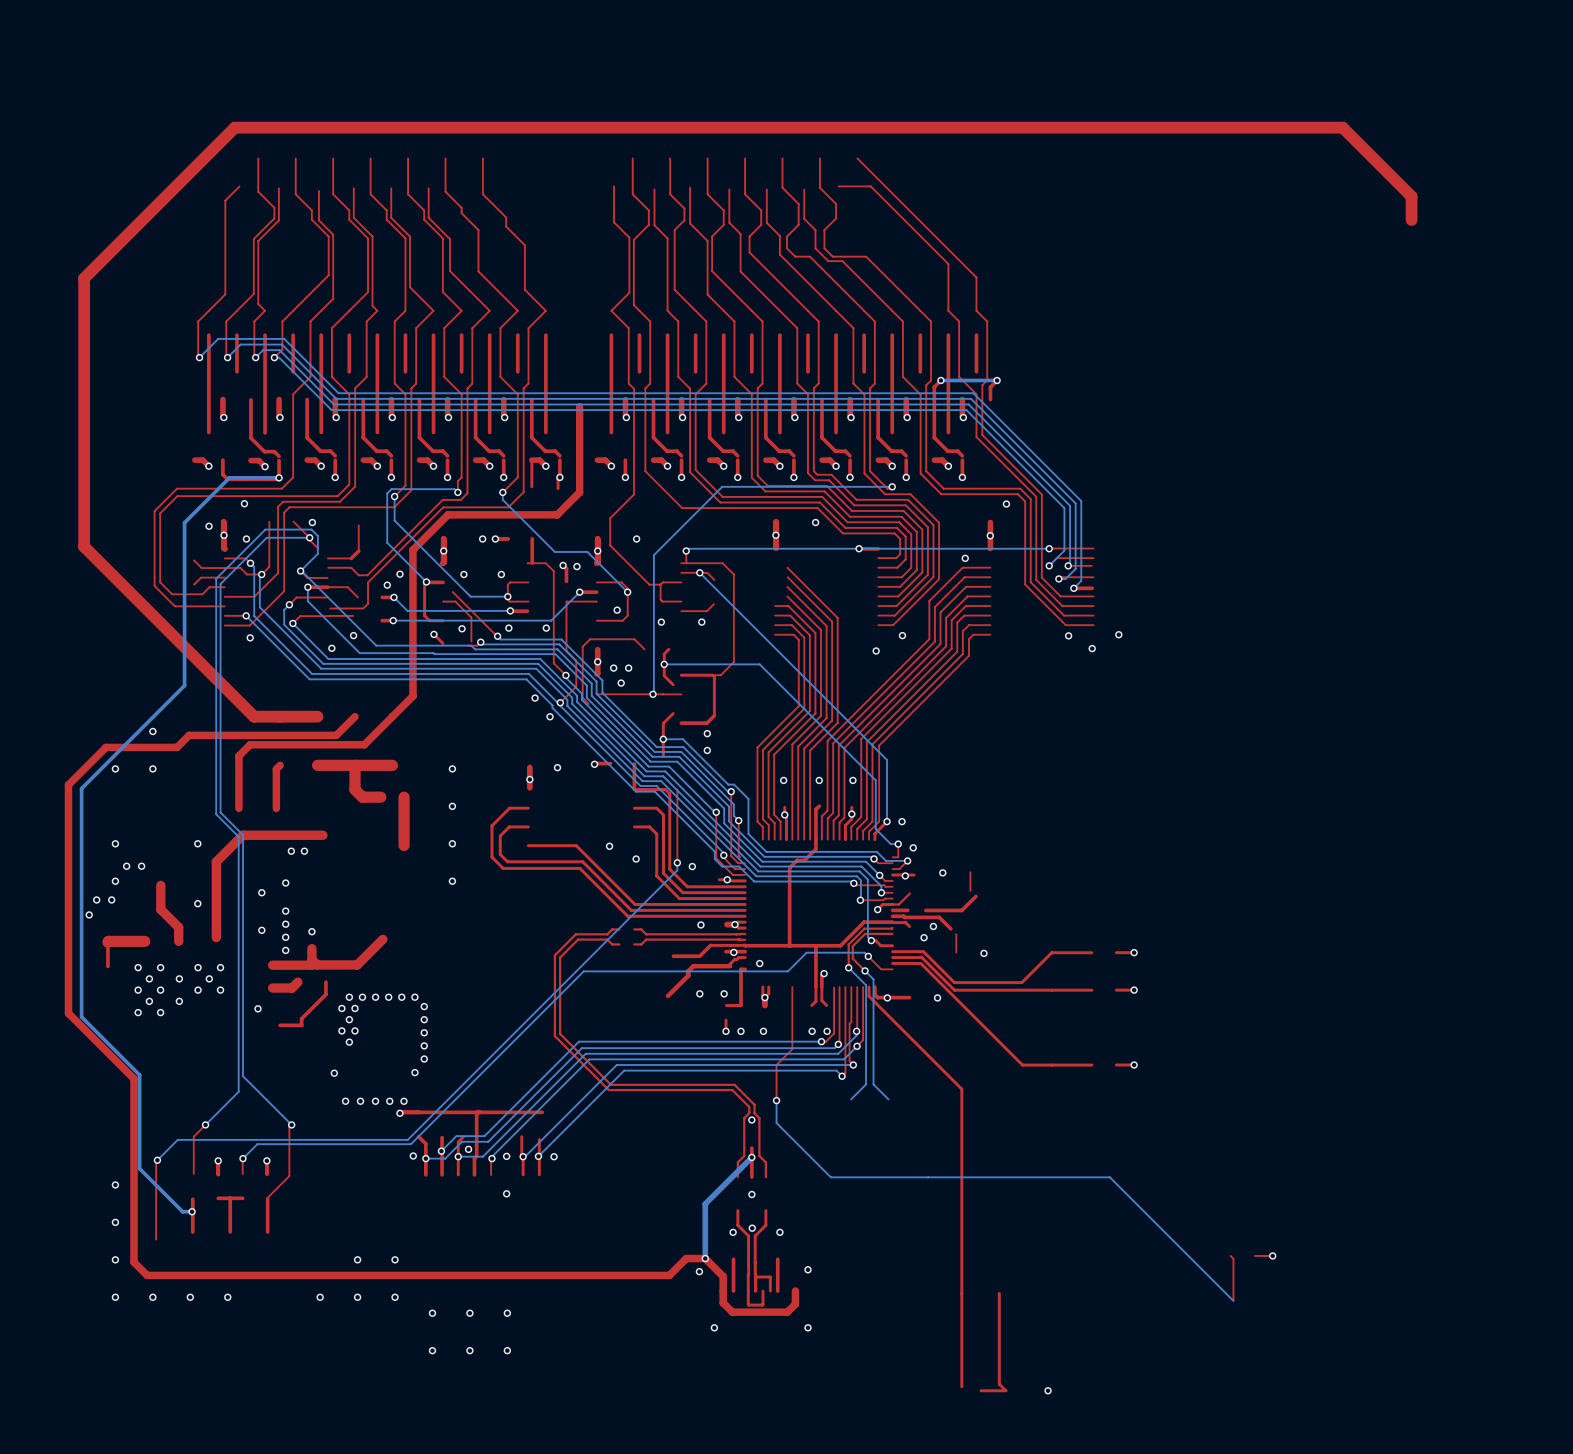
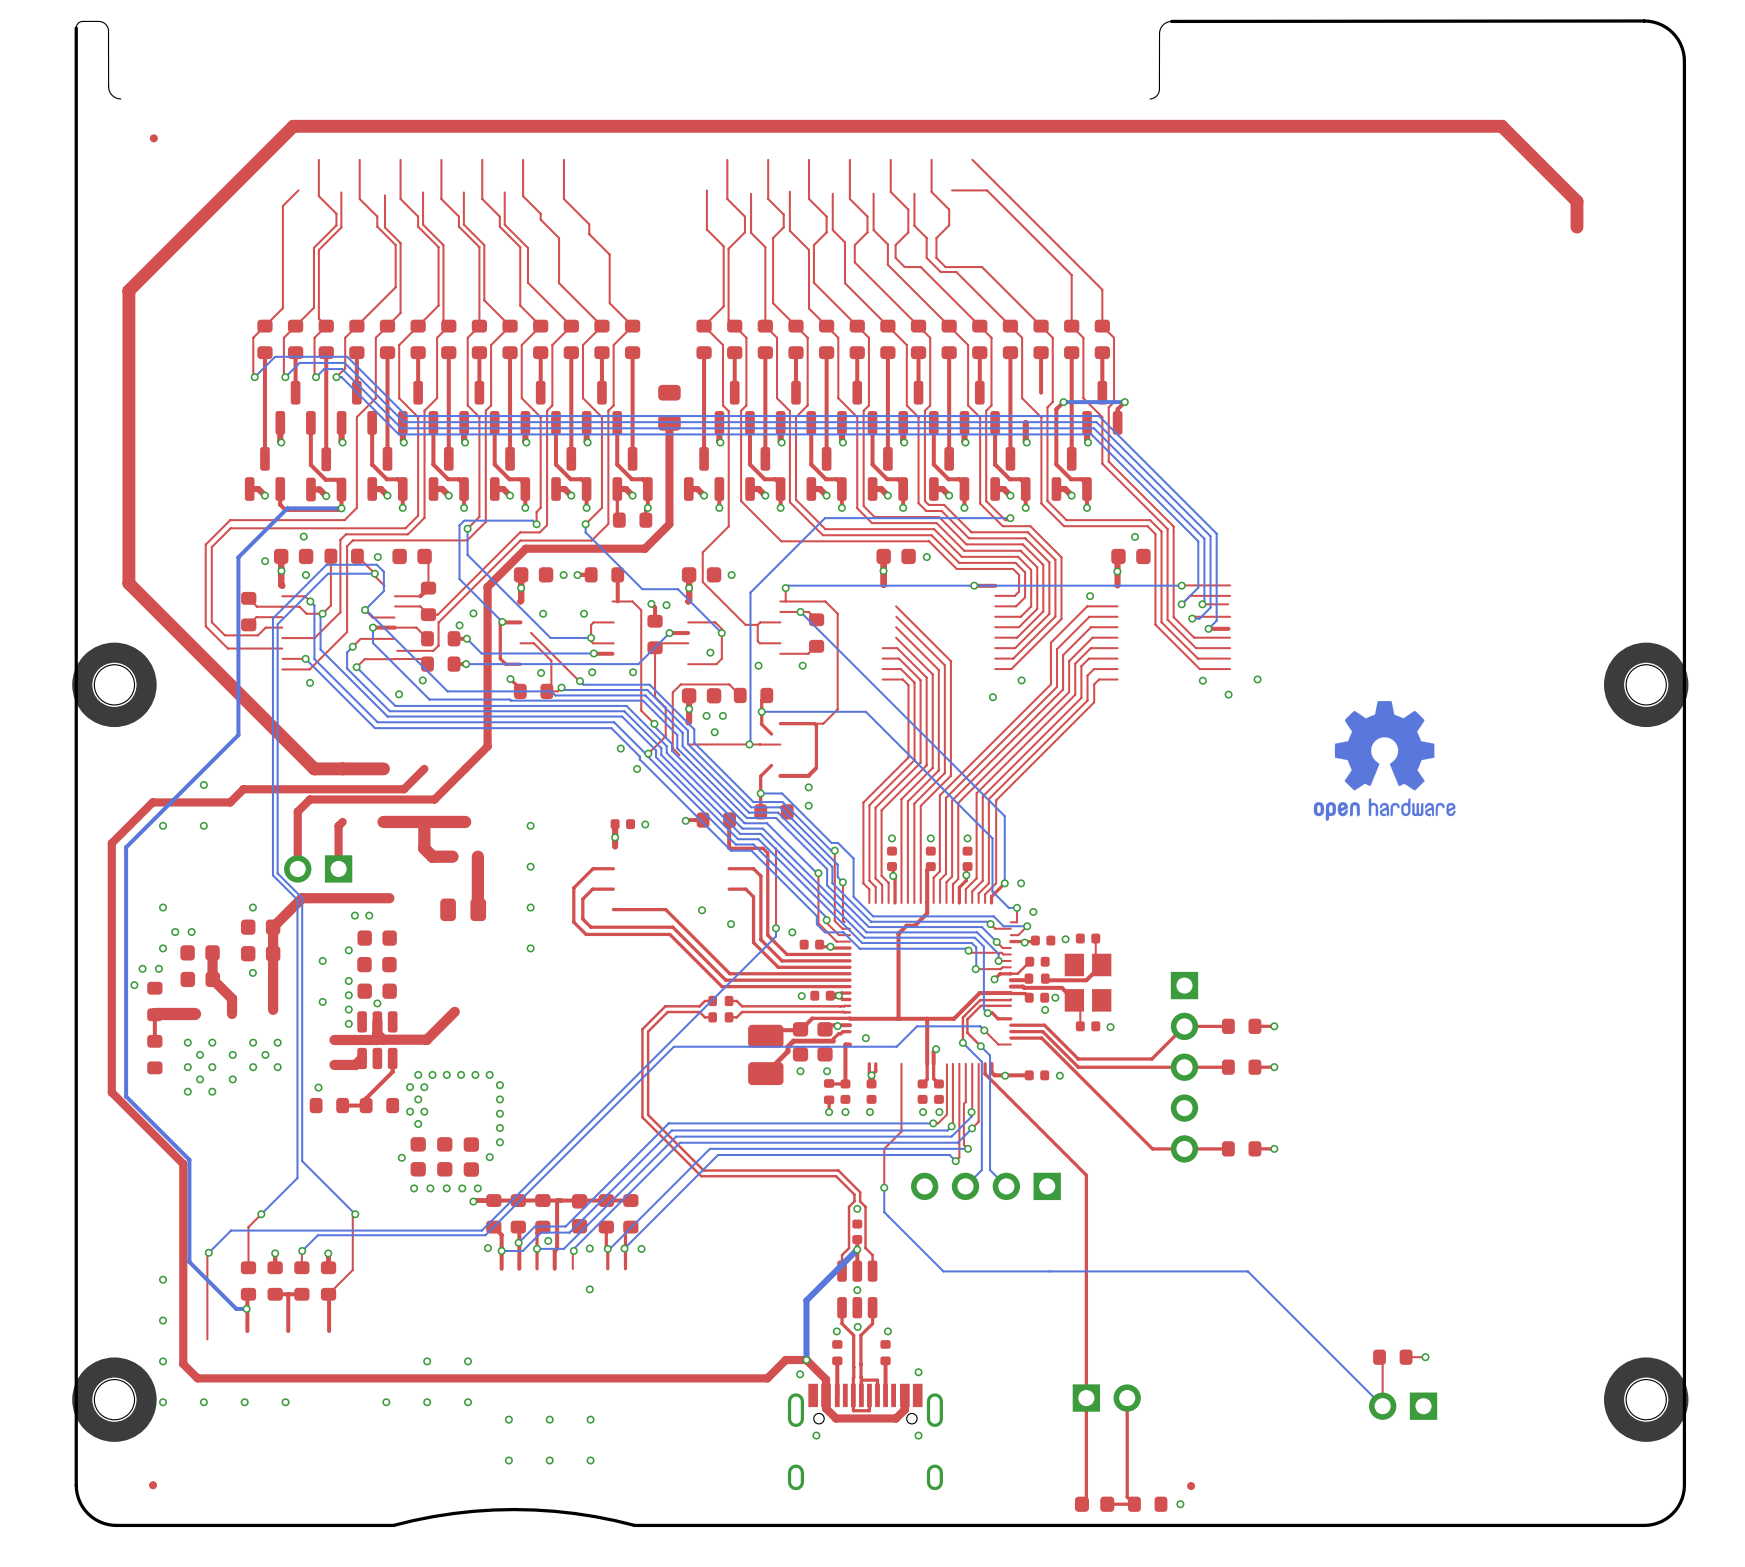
board edge: none -> (1150, 98) (1156, 96) (1159, 90) (1159, 30) (1163, 24) (1170, 21) (1644, 20) (1657, 23) (1665, 27) (1675, 36) (1682, 47) (1684, 61) (1684, 1485) (1682, 1498) (1675, 1510) (1665, 1519) (1657, 1523) (1644, 1525) (634, 1525) (574, 1513) (514, 1509) (453, 1513) (393, 1525) (116, 1525) (99, 1521) (88, 1513) (80, 1502) (76, 1485) (76, 27) (79, 22) (100, 21) (107, 26) (108, 89) (113, 96) (120, 98)
part: none -> (153, 138)
part: none -> (264, 339)
part: none -> (295, 339)
part: none -> (326, 339)
part: none -> (356, 339)
part: none -> (387, 339)
part: none -> (418, 339)
part: none -> (448, 339)
part: none -> (479, 339)
part: none -> (510, 339)
part: none -> (540, 339)
part: none -> (571, 339)
part: none -> (601, 339)
part: none -> (632, 339)
part: none -> (704, 339)
part: none -> (734, 339)
part: none -> (765, 339)
part: none -> (795, 339)
part: none -> (826, 339)
part: none -> (857, 339)
part: none -> (887, 339)
part: none -> (918, 339)
part: none -> (949, 339)
part: none -> (979, 339)
part: none -> (1010, 339)
part: none -> (1041, 339)
part: none -> (1071, 339)
part: none -> (1102, 339)
part: none -> (295, 407)
part: none -> (356, 407)
part: none -> (418, 407)
part: none -> (479, 407)
part: none -> (540, 407)
part: none -> (601, 407)
part: none -> (669, 407)
part: none -> (734, 407)
part: none -> (795, 407)
part: none -> (857, 407)
part: none -> (918, 407)
part: none -> (979, 407)
part: none -> (1102, 407)
part: none -> (264, 473)
part: none -> (326, 474)
part: none -> (387, 473)
part: none -> (448, 473)
part: none -> (510, 473)
part: none -> (571, 473)
part: none -> (632, 473)
part: none -> (704, 473)
part: none -> (765, 473)
part: none -> (826, 473)
part: none -> (887, 473)
part: none -> (949, 473)
part: none -> (1010, 473)
part: none -> (1071, 473)
part: none -> (632, 520)
part: none -> (293, 556)
part: none -> (344, 556)
part: none -> (412, 556)
part: none -> (896, 556)
part: none -> (1130, 556)
part: none -> (533, 574)
part: none -> (604, 574)
part: none -> (701, 574)
part: none -> (428, 601)
part: none -> (248, 611)
part: none -> (816, 633)
part: none -> (655, 634)
part: none -> (440, 638)
part: none -> (440, 664)
part: none -> (114, 684)
part: none -> (1646, 684)
part: none -> (533, 691)
part: none -> (701, 695)
part: none -> (753, 695)
drawing: none -> [1313, 701, 1456, 821]
part: none -> (773, 811)
part: none -> (716, 820)
part: none -> (622, 824)
part: none -> (891, 858)
part: none -> (930, 858)
part: none -> (967, 858)
part: none -> (318, 868)
part: none -> (463, 909)
part: none -> (260, 927)
part: none -> (377, 938)
part: none -> (1088, 938)
part: none -> (1043, 940)
part: none -> (811, 944)
part: none -> (200, 952)
part: none -> (260, 953)
part: none -> (1037, 961)
part: none -> (376, 964)
part: none -> (1037, 978)
part: none -> (200, 979)
part: none -> (1088, 982)
part: none -> (377, 991)
part: none -> (822, 995)
part: none -> (1036, 997)
part: none -> (154, 1001)
part: none -> (720, 1000)
part: none -> (720, 1017)
part: none -> (1088, 1026)
part: none -> (1241, 1026)
part: none -> (377, 1040)
part: none -> (800, 1041)
part: none -> (825, 1041)
part: none -> (154, 1054)
part: none -> (765, 1054)
part: none -> (1184, 1067)
part: none -> (1241, 1067)
part: none -> (1036, 1075)
part: none -> (829, 1091)
part: none -> (845, 1091)
part: none -> (871, 1091)
part: none -> (922, 1091)
part: none -> (938, 1091)
part: none -> (329, 1105)
part: none -> (379, 1105)
part: none -> (1241, 1148)
part: none -> (418, 1156)
part: none -> (444, 1156)
part: none -> (471, 1157)
part: none -> (985, 1186)
part: none -> (493, 1213)
part: none -> (518, 1213)
part: none -> (542, 1213)
part: none -> (579, 1213)
part: none -> (606, 1213)
part: none -> (630, 1213)
part: none -> (857, 1231)
part: none -> (248, 1281)
part: none -> (275, 1281)
part: none -> (301, 1281)
part: none -> (328, 1281)
part: none -> (857, 1289)
part: none -> (837, 1352)
part: none -> (885, 1352)
part: none -> (1392, 1357)
part: none -> (1106, 1398)
part: none -> (114, 1399)
part: none -> (1646, 1399)
part: none -> (1403, 1406)
part: none -> (865, 1437)
part: none -> (153, 1485)
part: none -> (1191, 1486)
part: none -> (1094, 1504)
part: none -> (1147, 1504)

